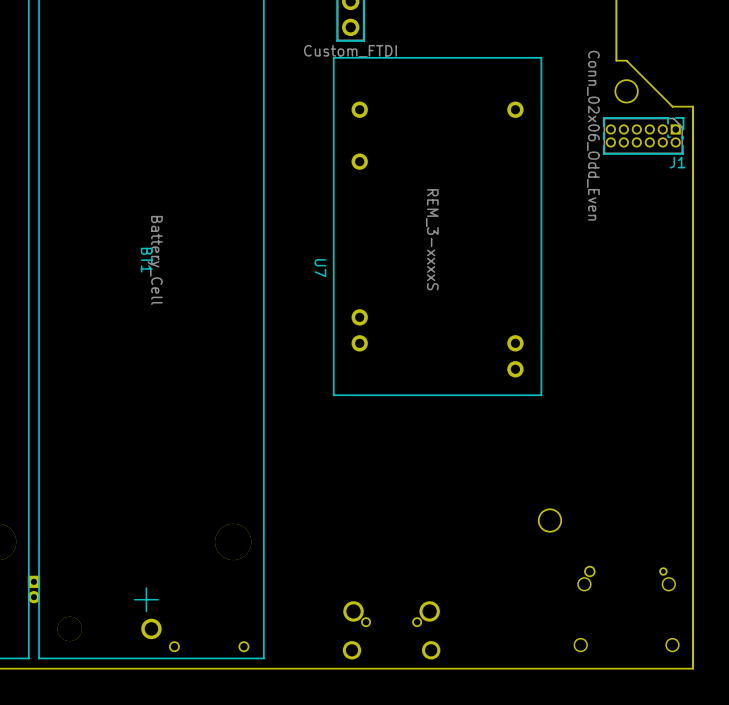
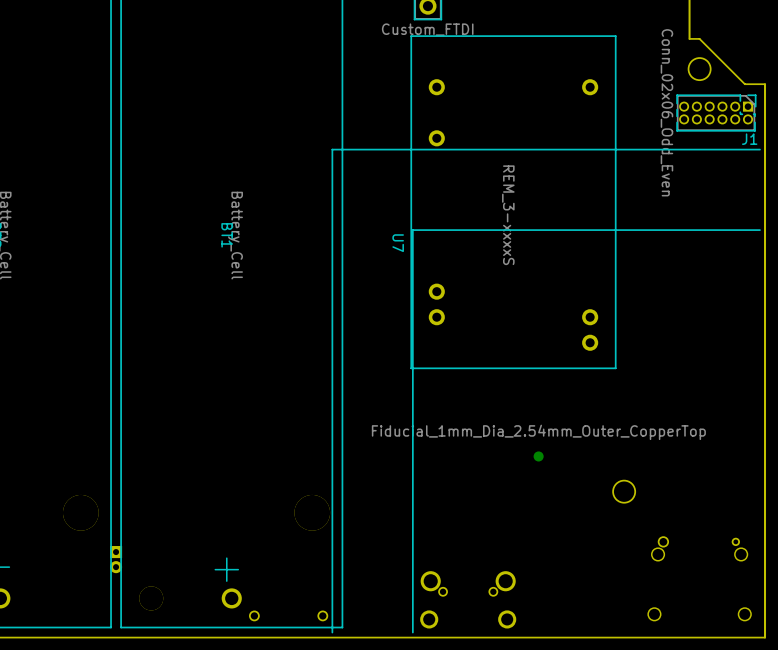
line: none -> (759, 149) (332, 149) (332, 632)
line: none -> (759, 230) (412, 230) (412, 632)
part: none -> Fiducial_1mm_Dia_2.54mm_Outer_CopperTop (538, 456)

